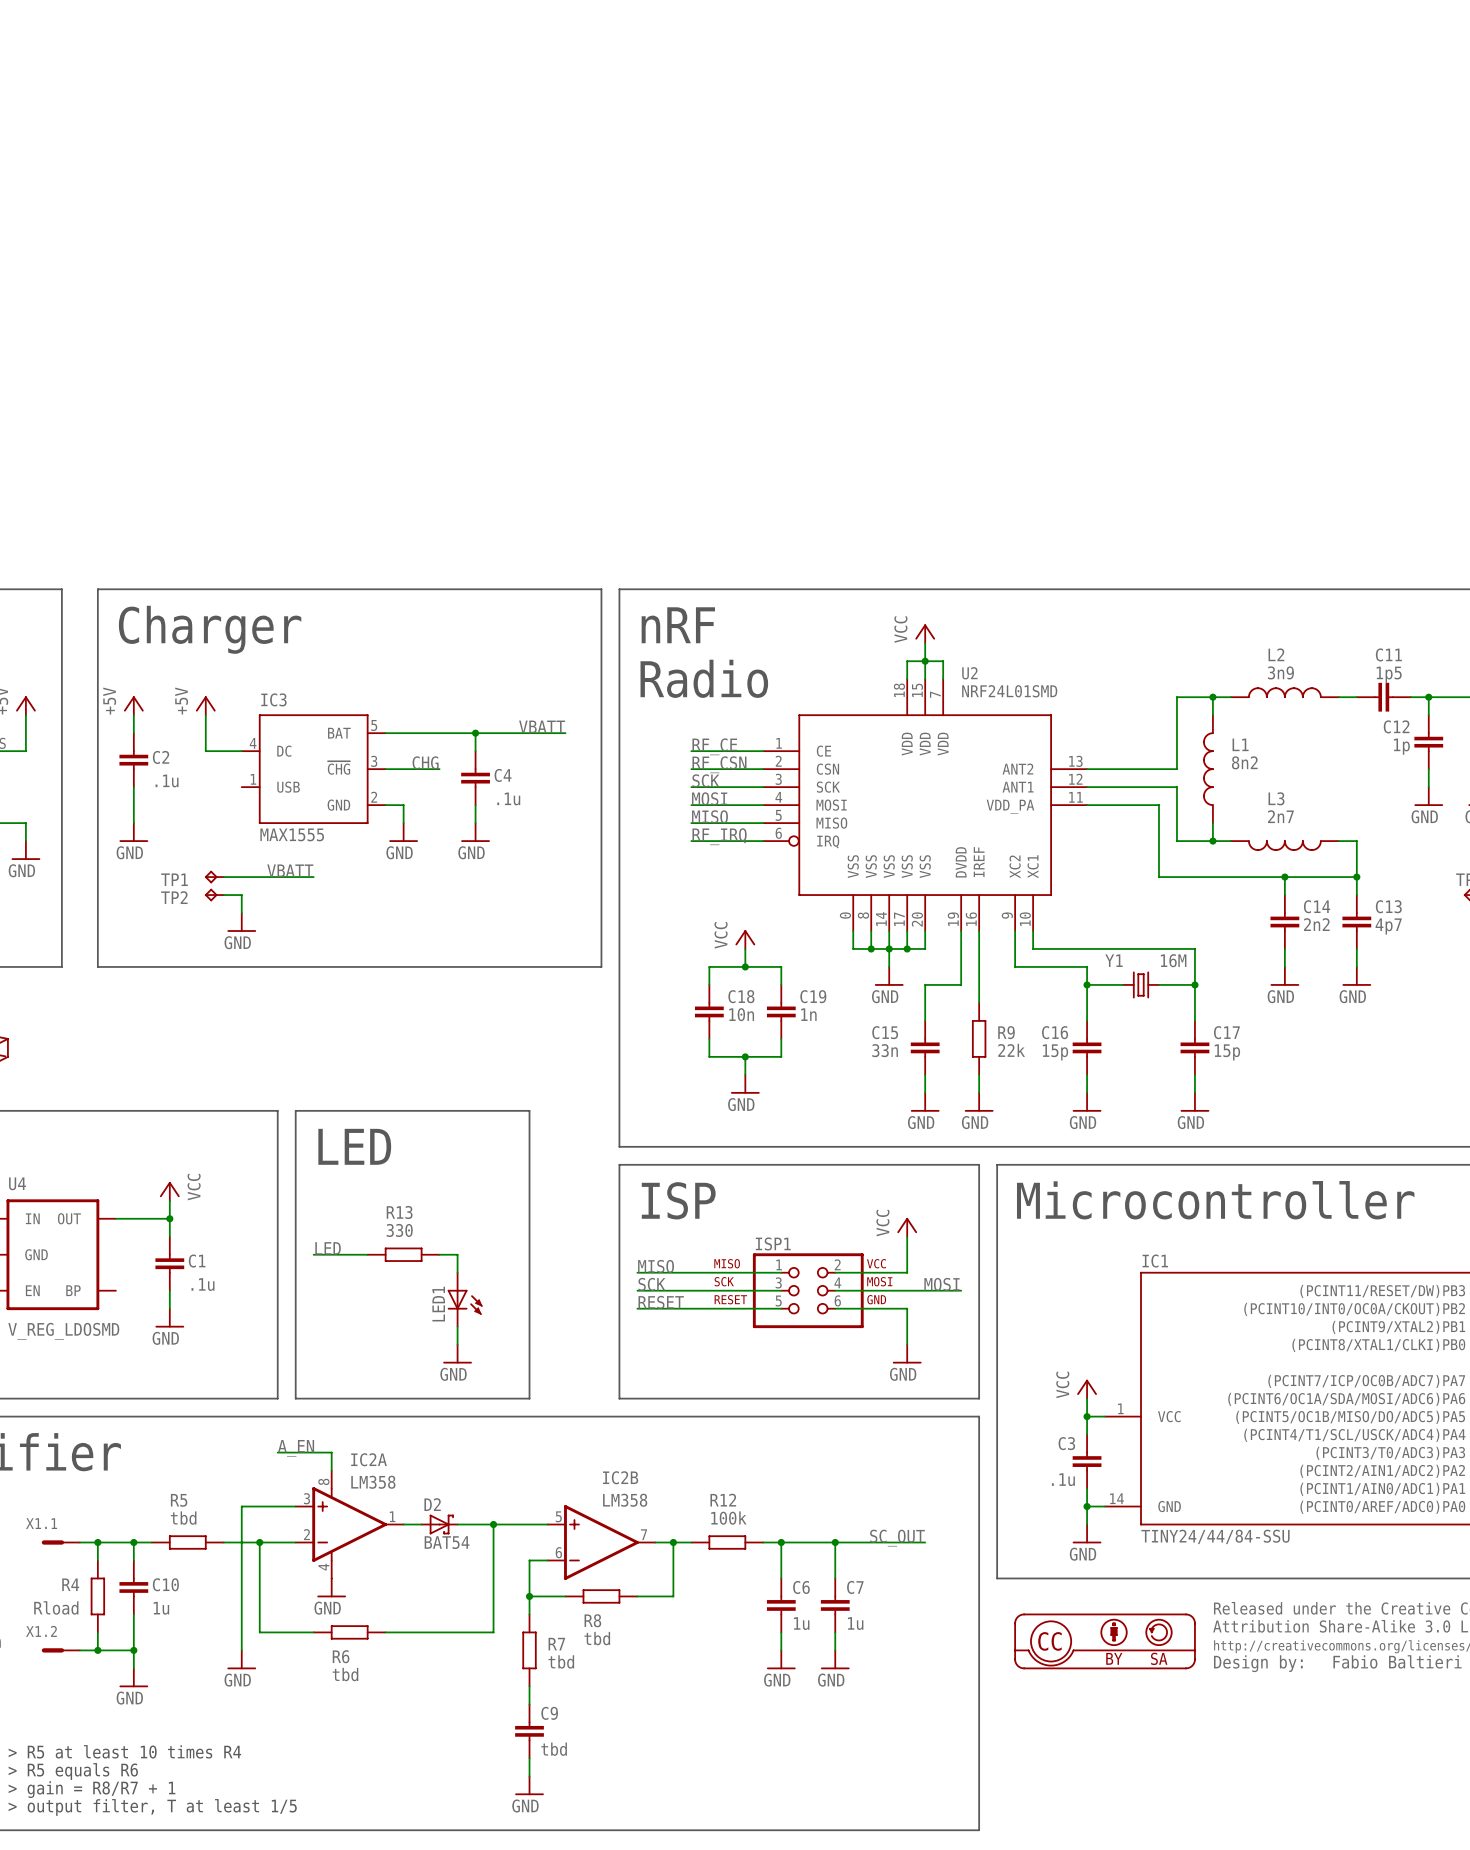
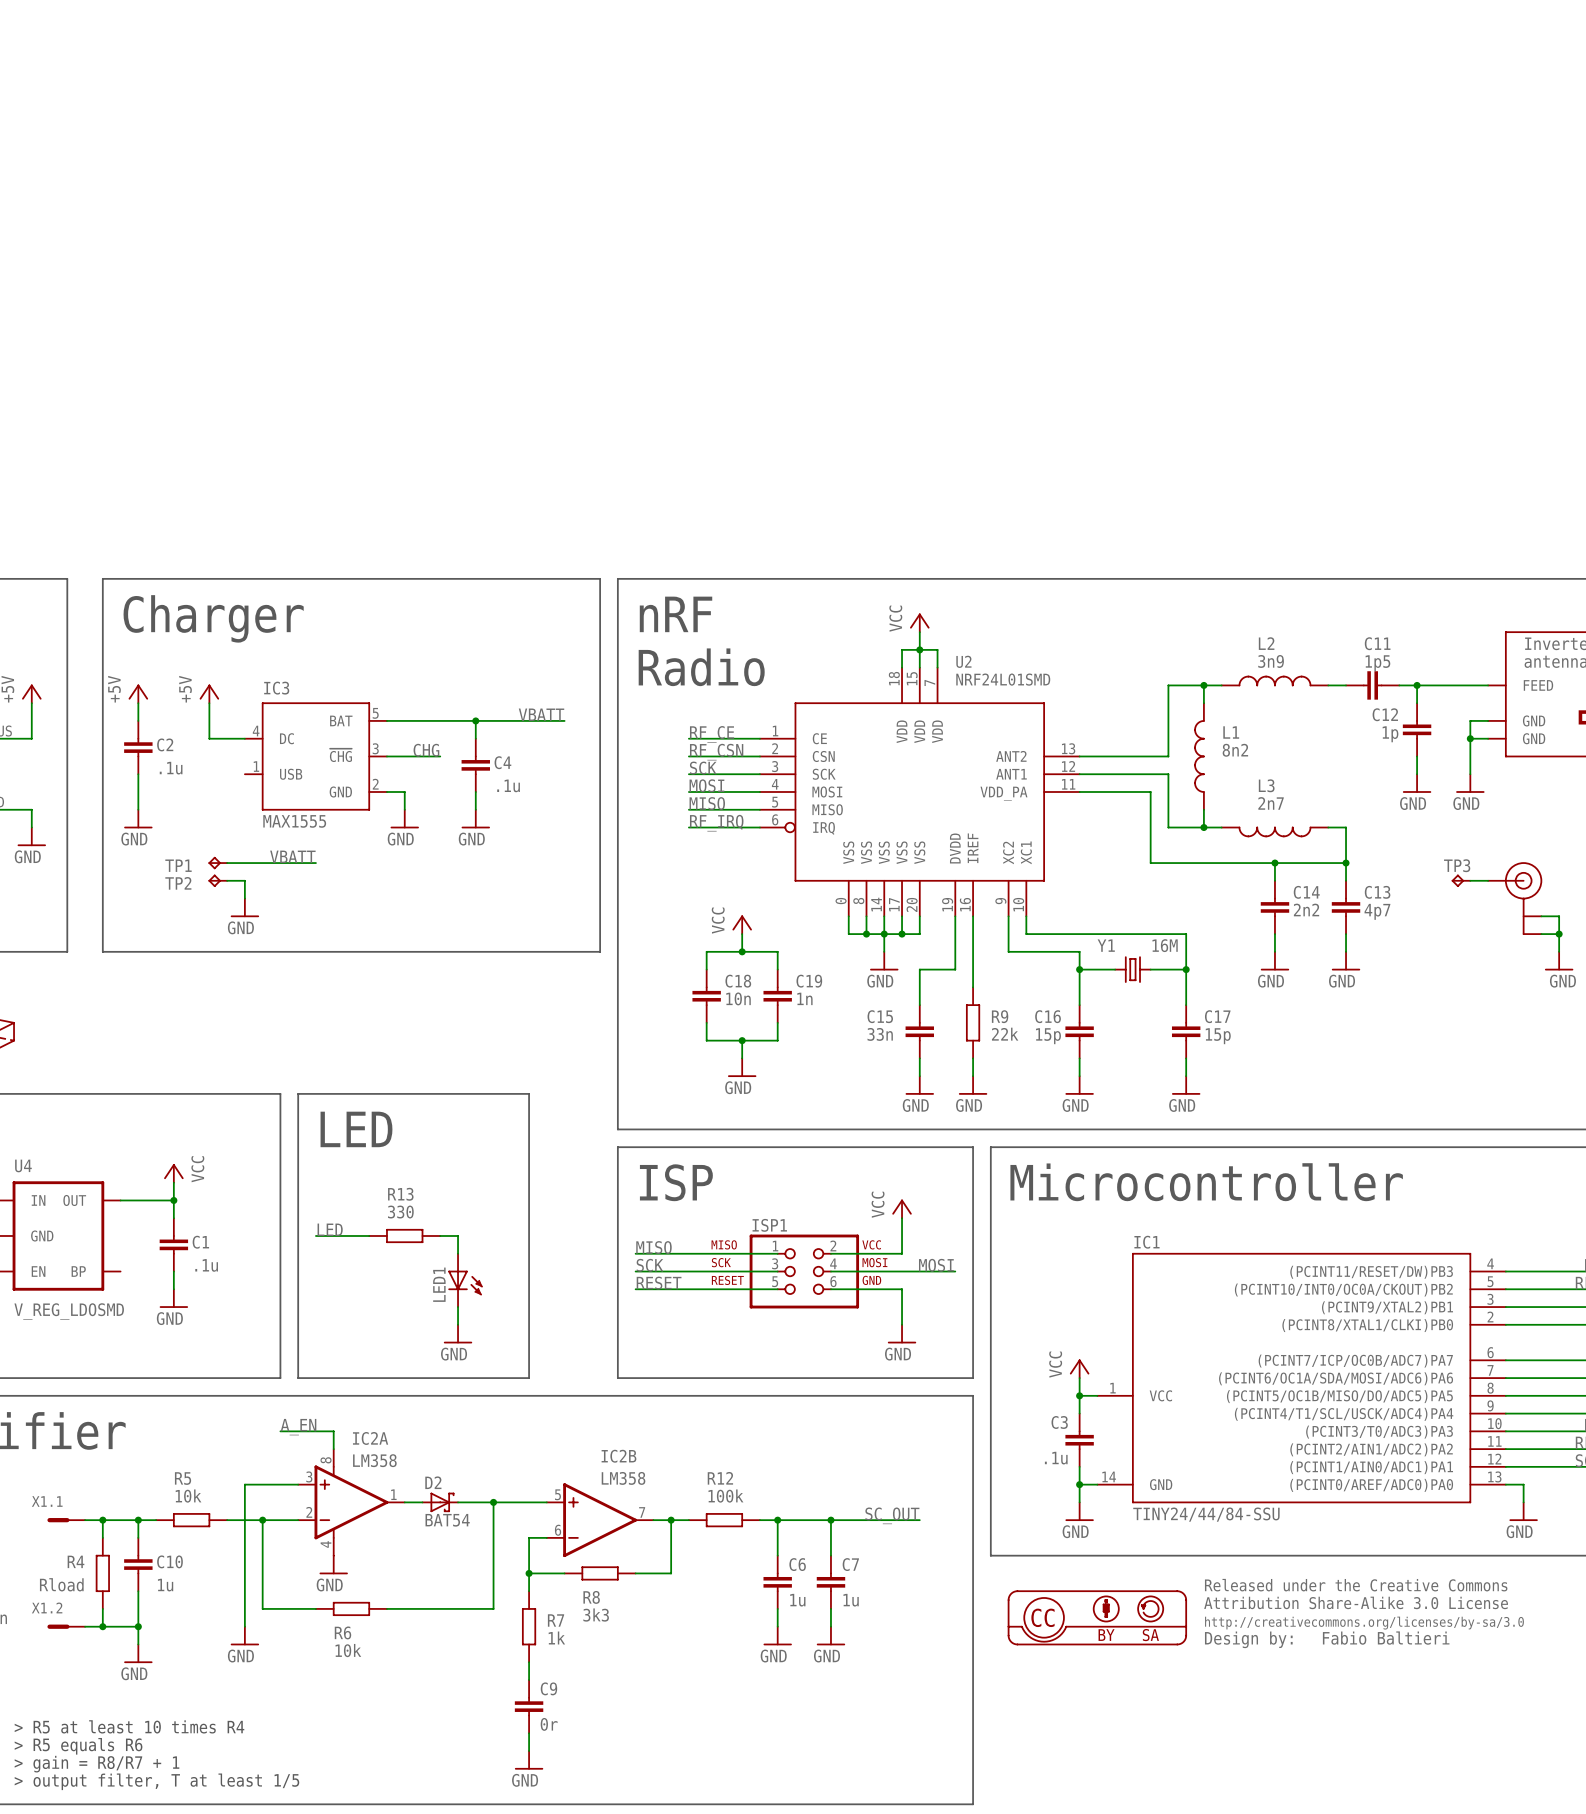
R5 value: tbd (183, 1518) -> 10k (188, 1496)
R8 value: tbd (597, 1638) -> 3k3 (596, 1615)
R7 value: tbd (561, 1661) -> 1k (556, 1637)
R6 value: tbd (345, 1674) -> 10k (348, 1650)
C9 value: tbd (554, 1749) -> 0r (549, 1724)

